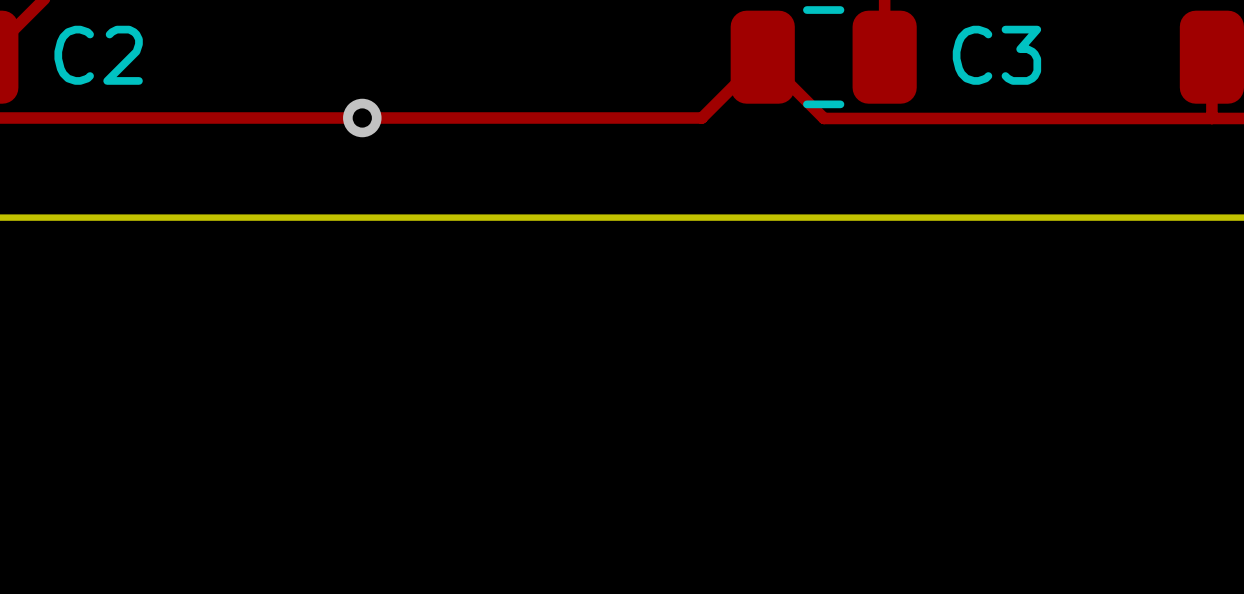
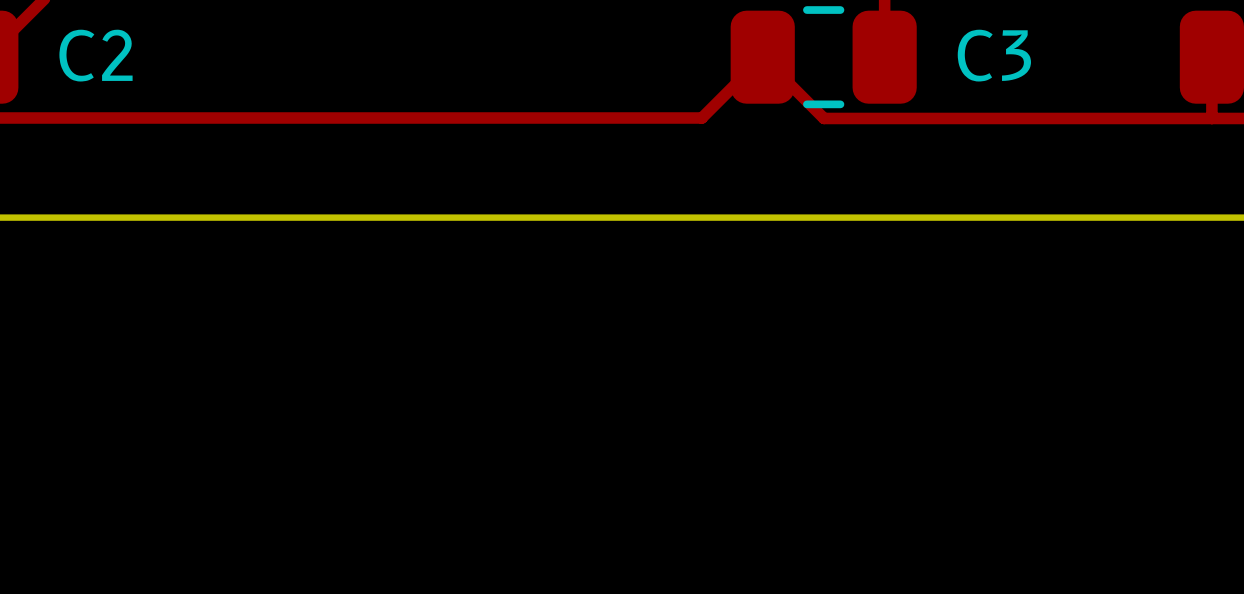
via: (362, 118) -> none

